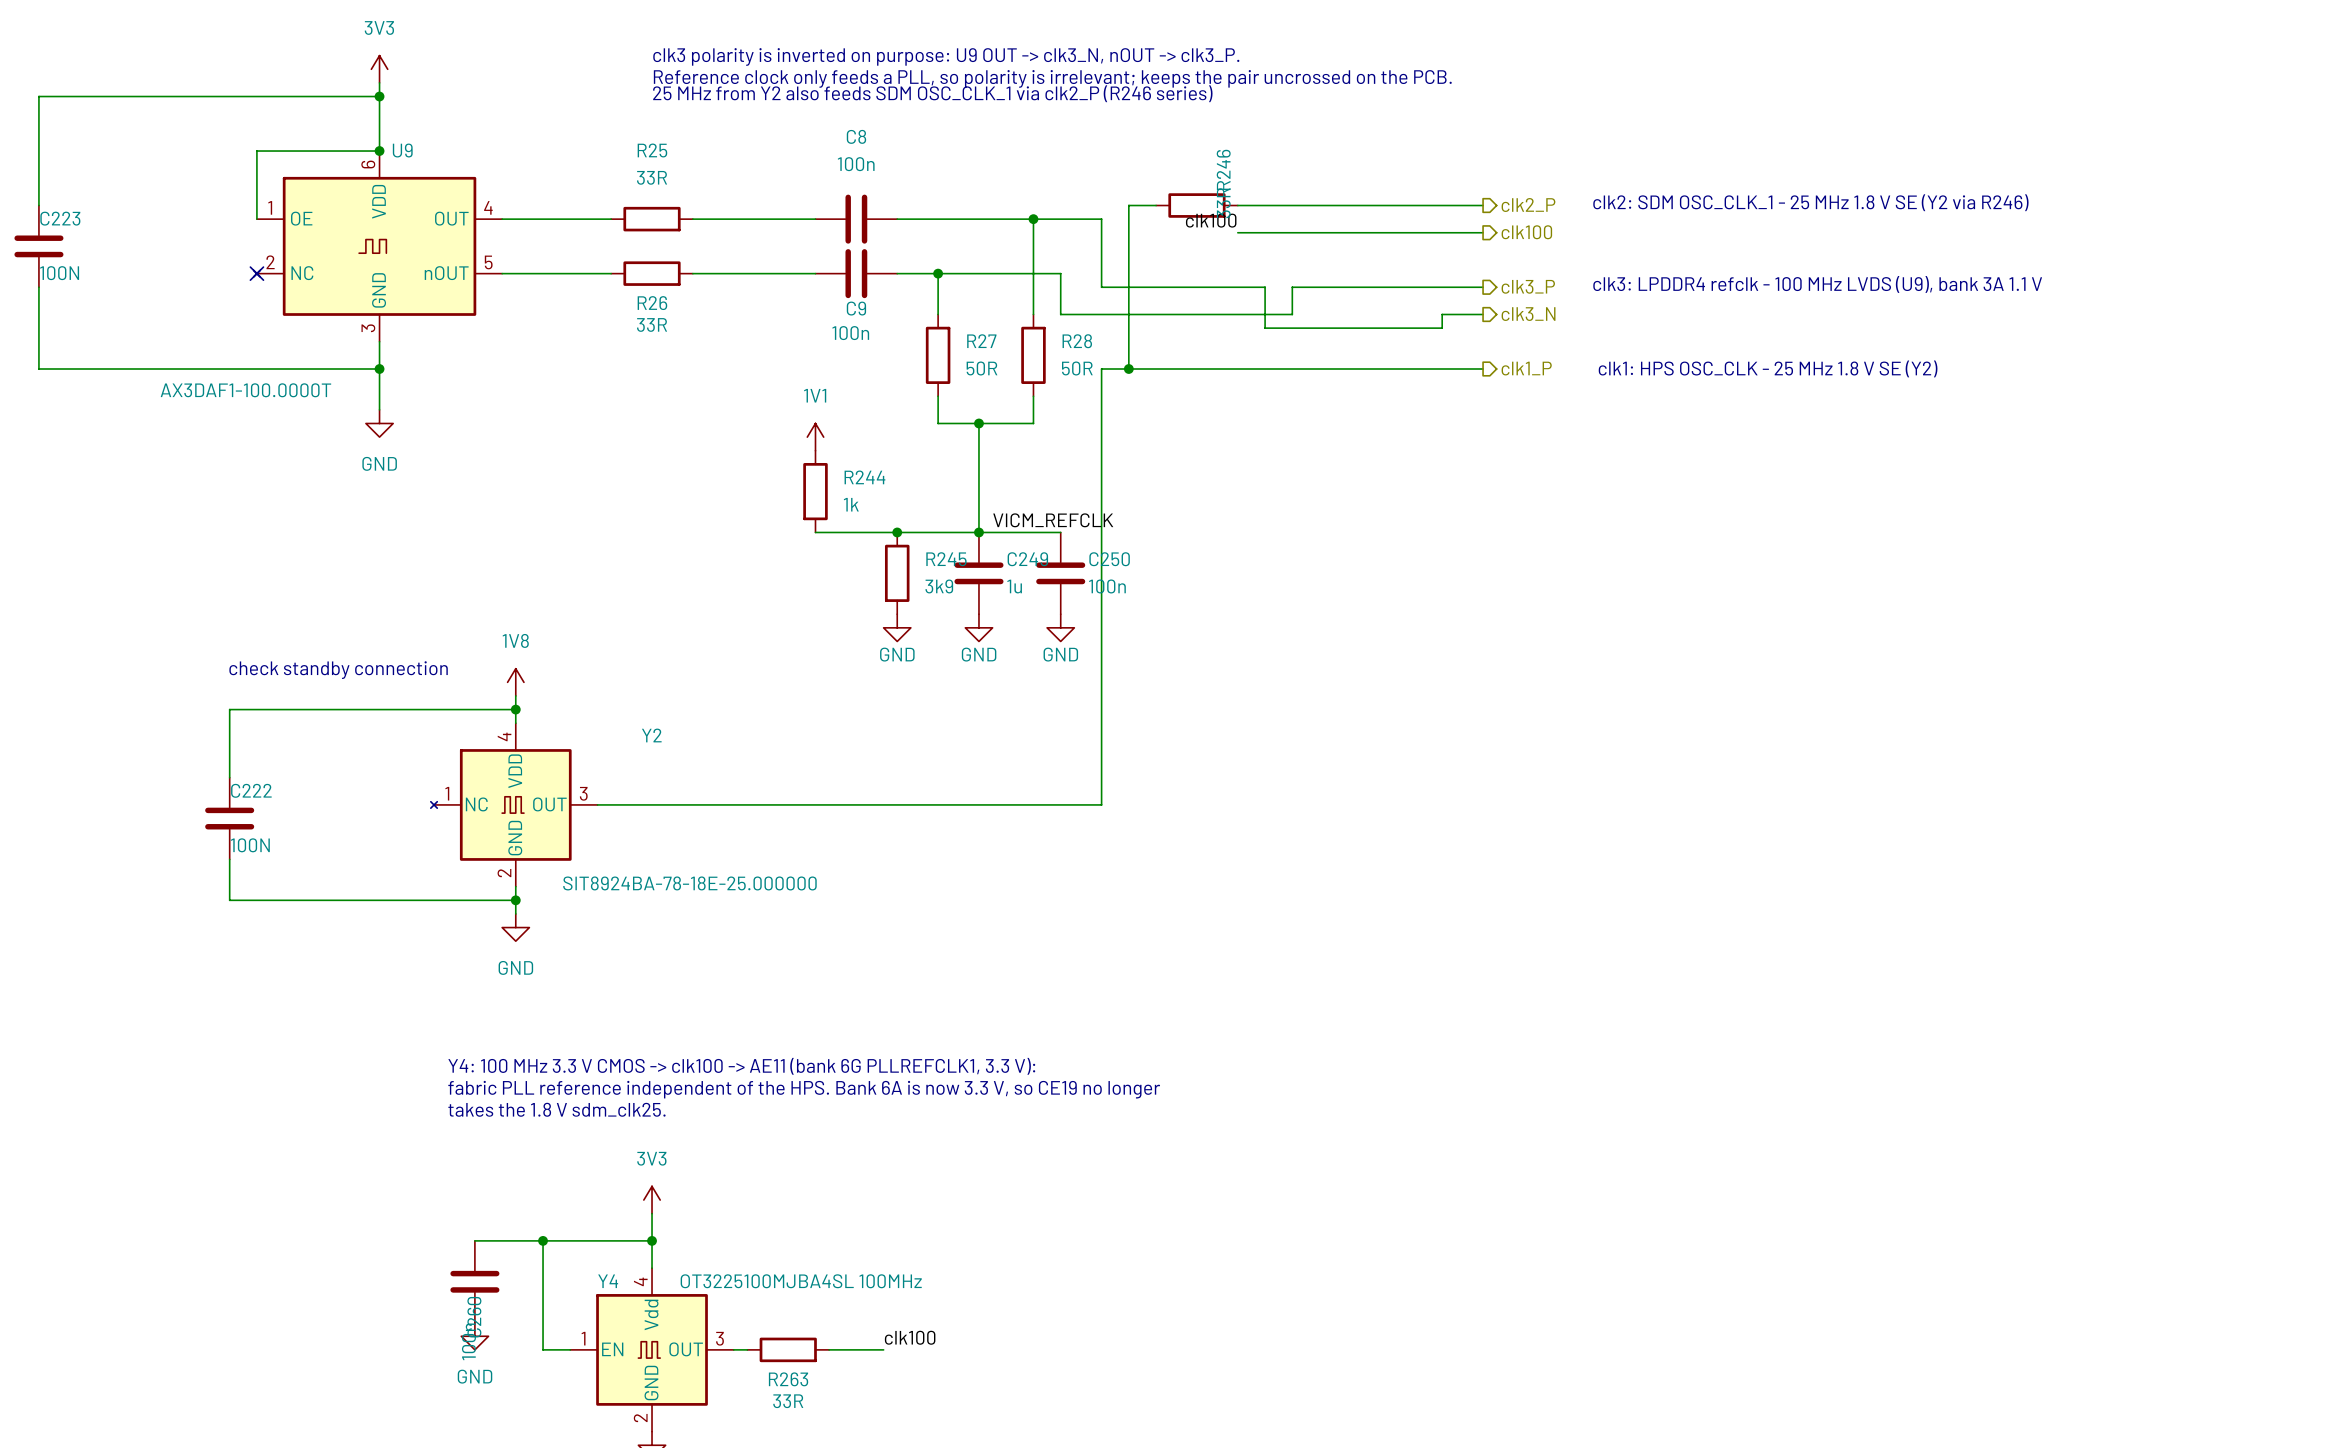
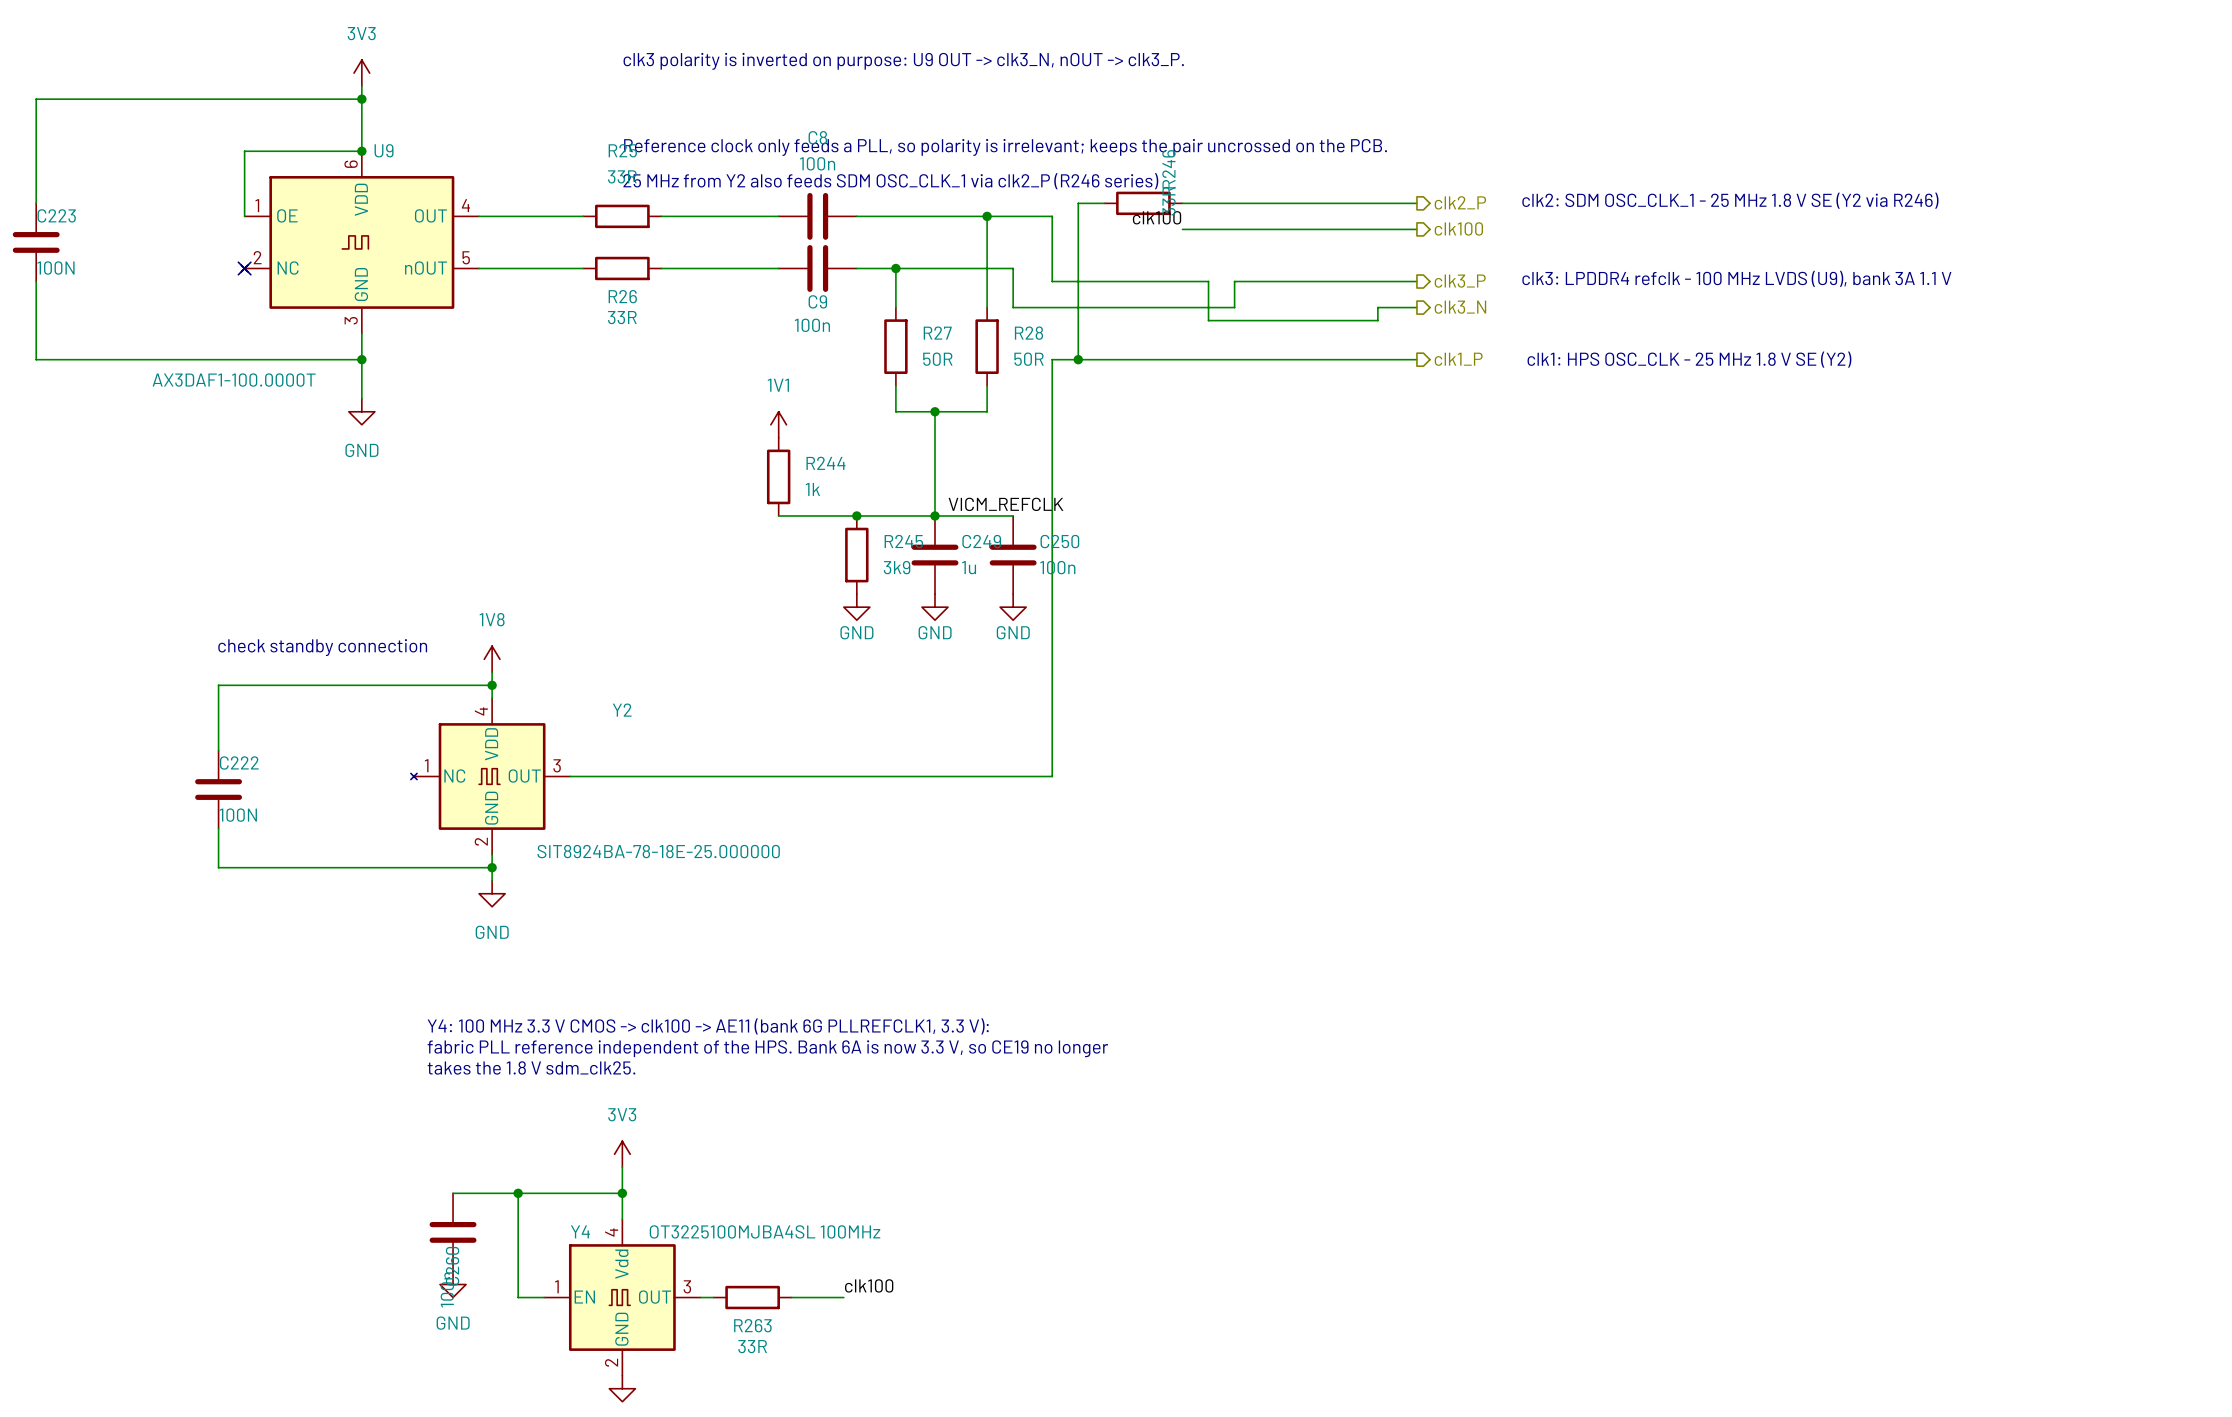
text position: Reference clock only feeds a PLL, so polarity is irrelevant; keeps the pair uncrossed on the PCB. (1052, 78) -> Reference clock only feeds a PLL, so polarity is irrelevant; keeps the pair uncrossed on the PCB. (1005, 147)
text position: 25 MHz from Y2 also feeds SDM OSC_CLK_1 via clk2_P (R246 series) (932, 93) -> 25 MHz from Y2 also feeds SDM OSC_CLK_1 via clk2_P (R246 series) (890, 181)

